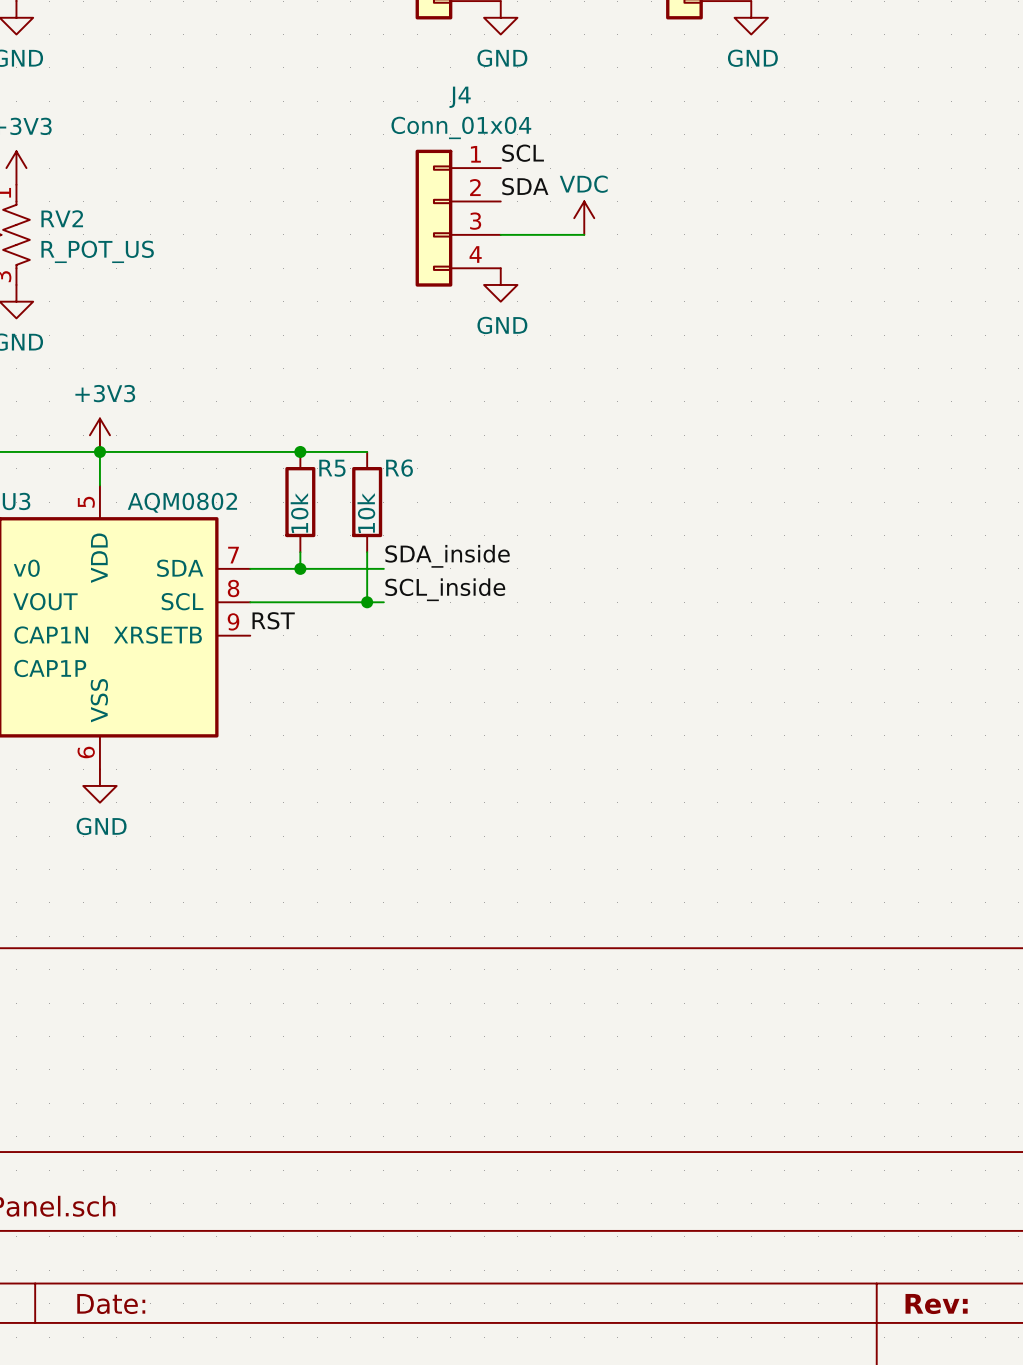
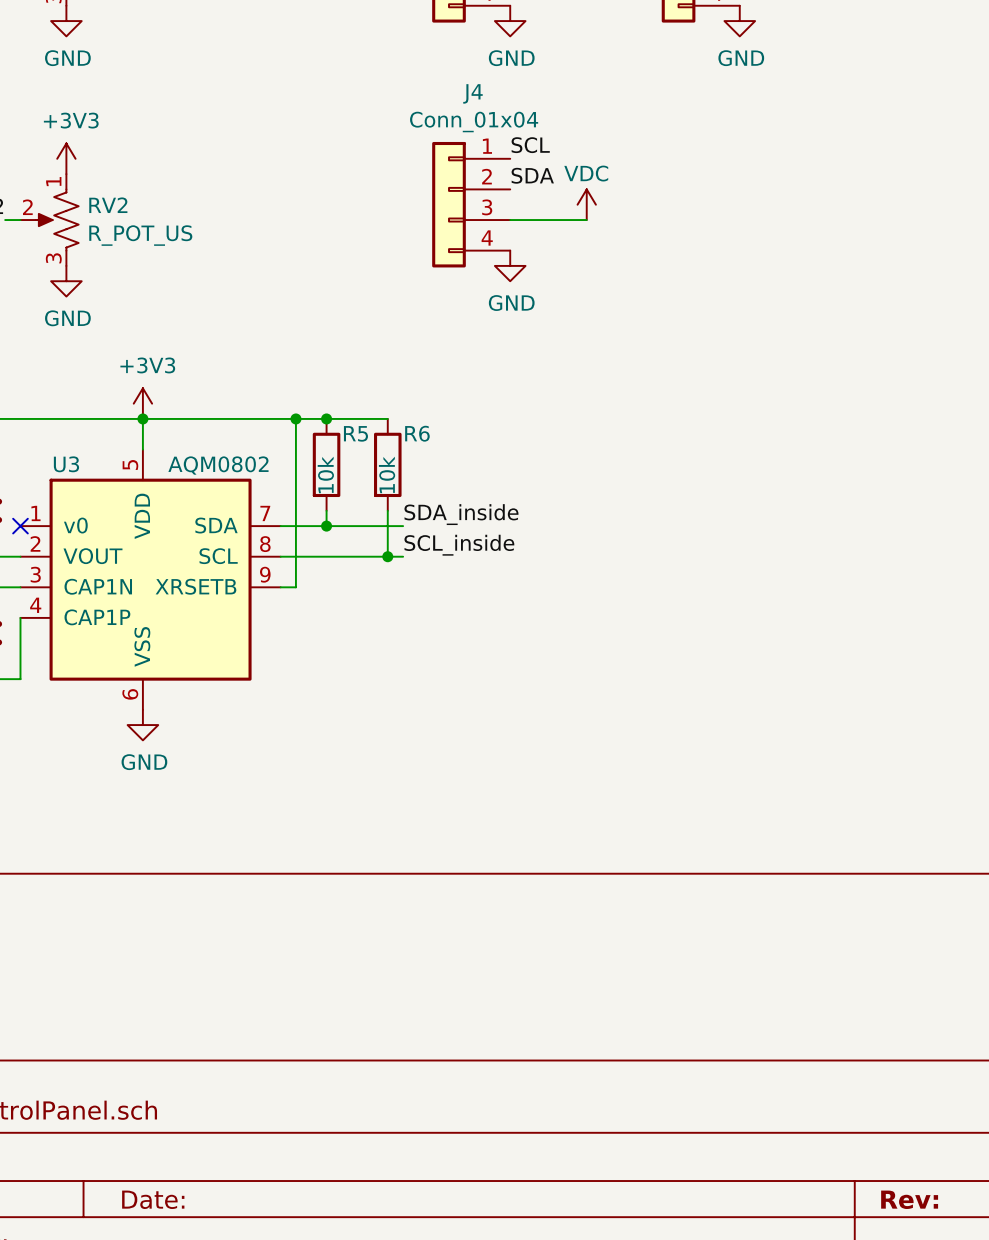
wire: none -> (295, 418) (295, 587) (280, 587)
junction: none -> (295, 418)
label: RST (273, 620) -> none

